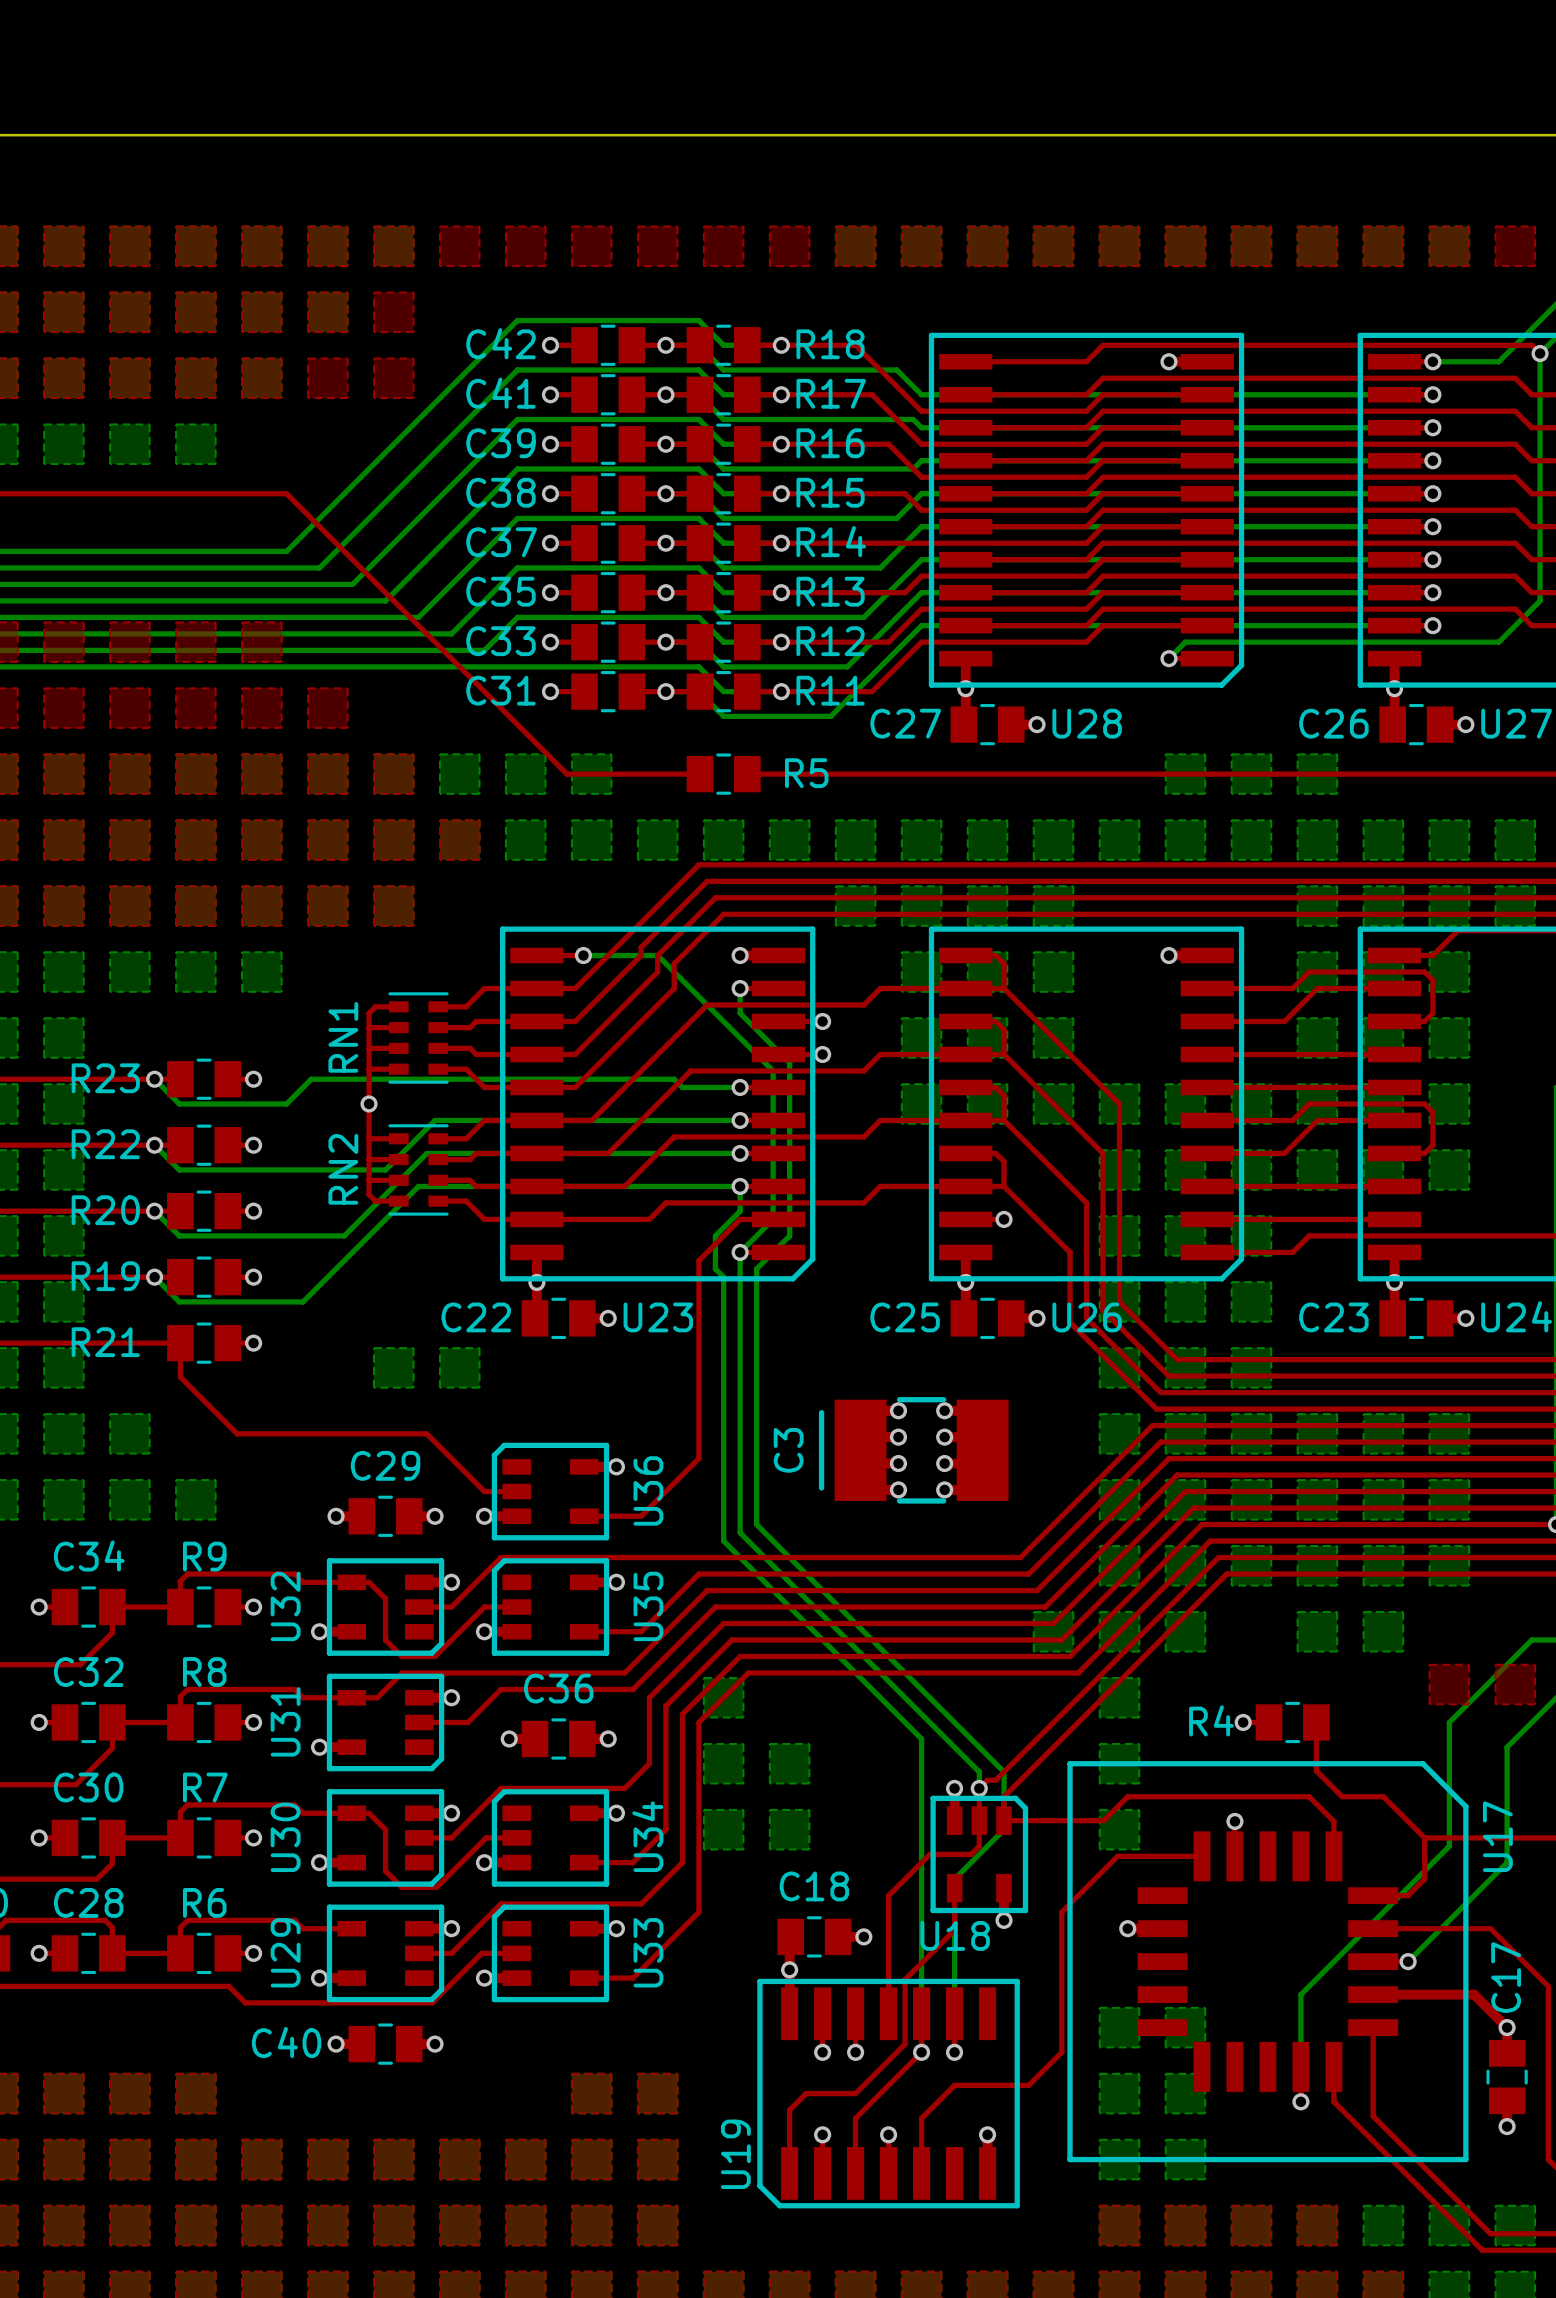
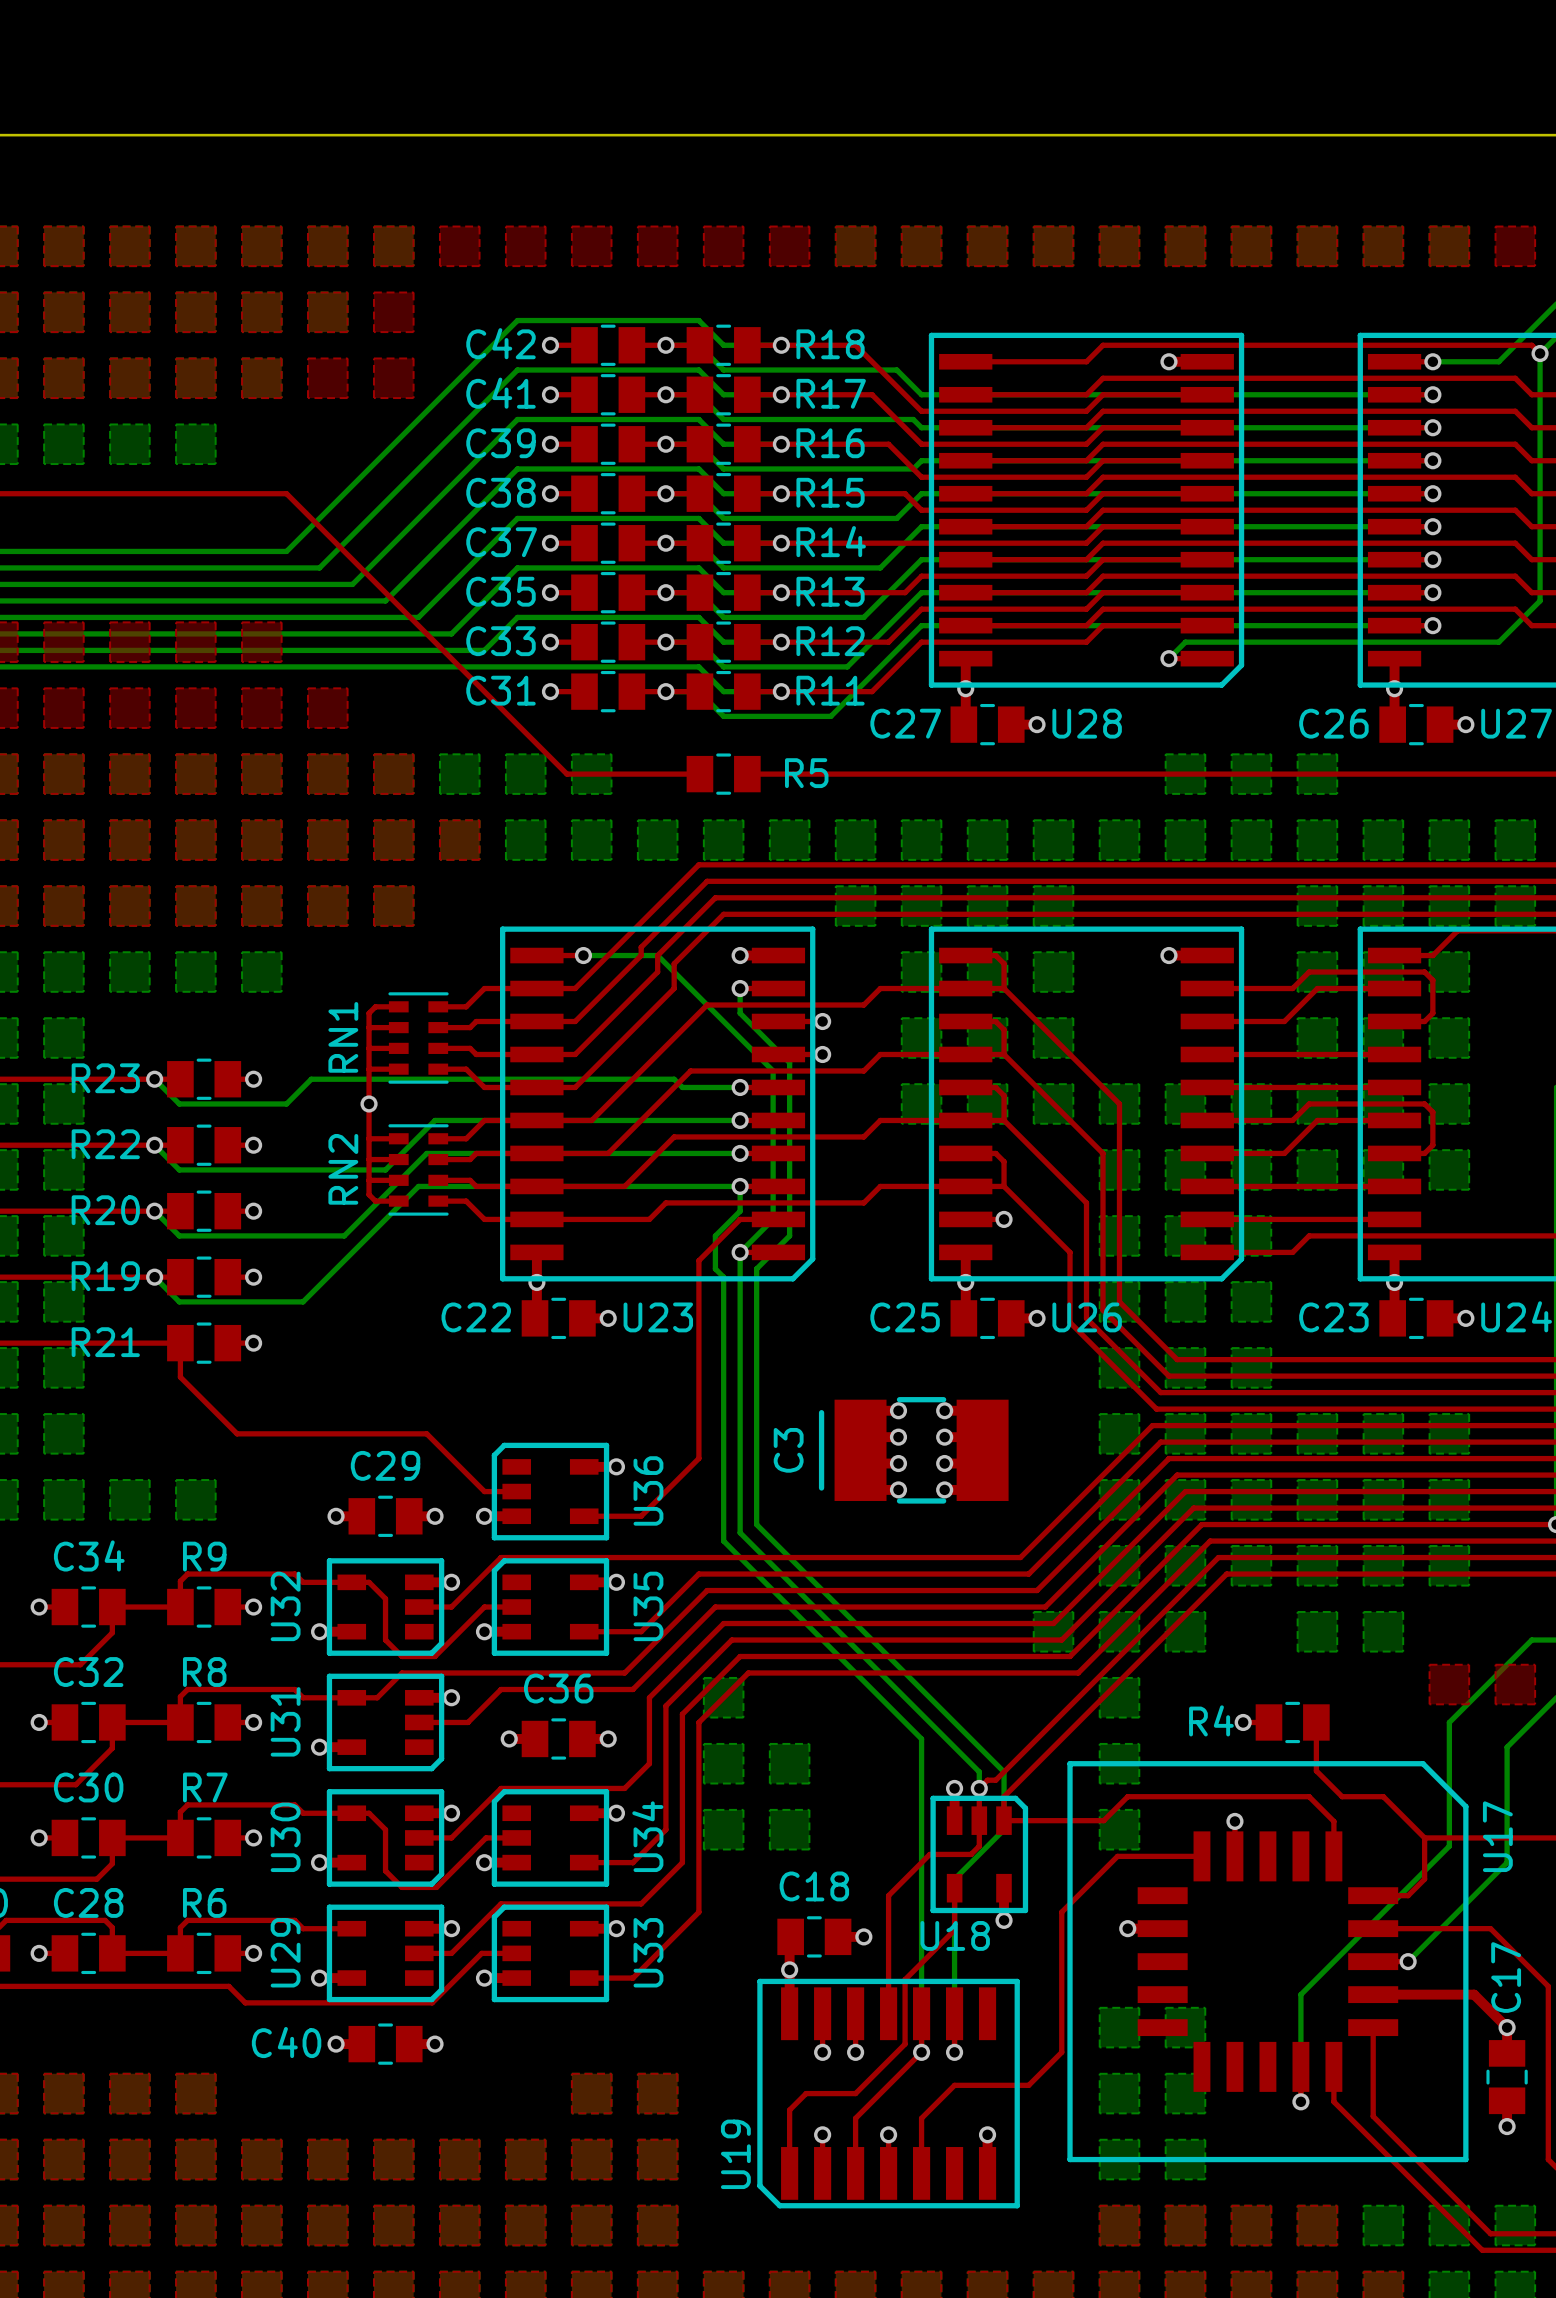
bottom zone outline: (373, 1348) (413, 1348) (413, 1387) (373, 1387) (373, 1348) -> none
bottom zone outline: (439, 1348) (479, 1348) (479, 1387) (439, 1387) (439, 1348) -> none
bottom zone outline: (110, 1414) (149, 1414) (149, 1453) (110, 1453) (110, 1414) -> none

